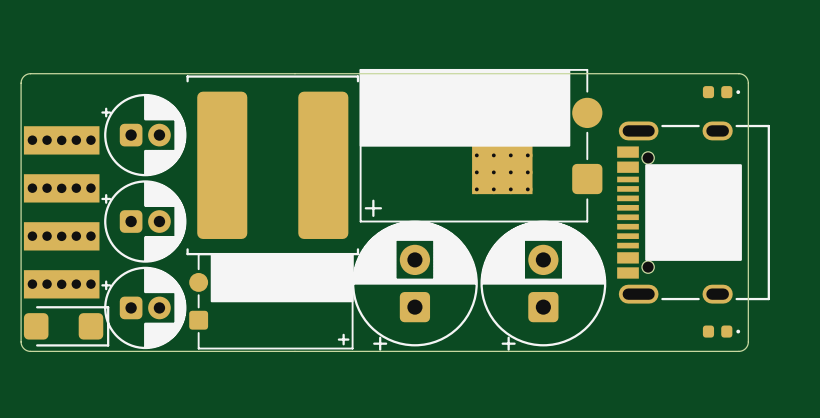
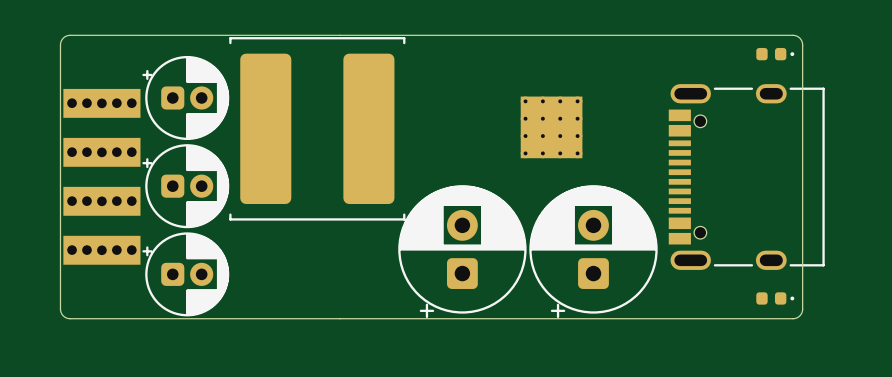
part: (481, 145) -> none
drawing: [645, 164, 742, 261] -> none
part: (271, 301) -> none
part: (66, 326) -> none

